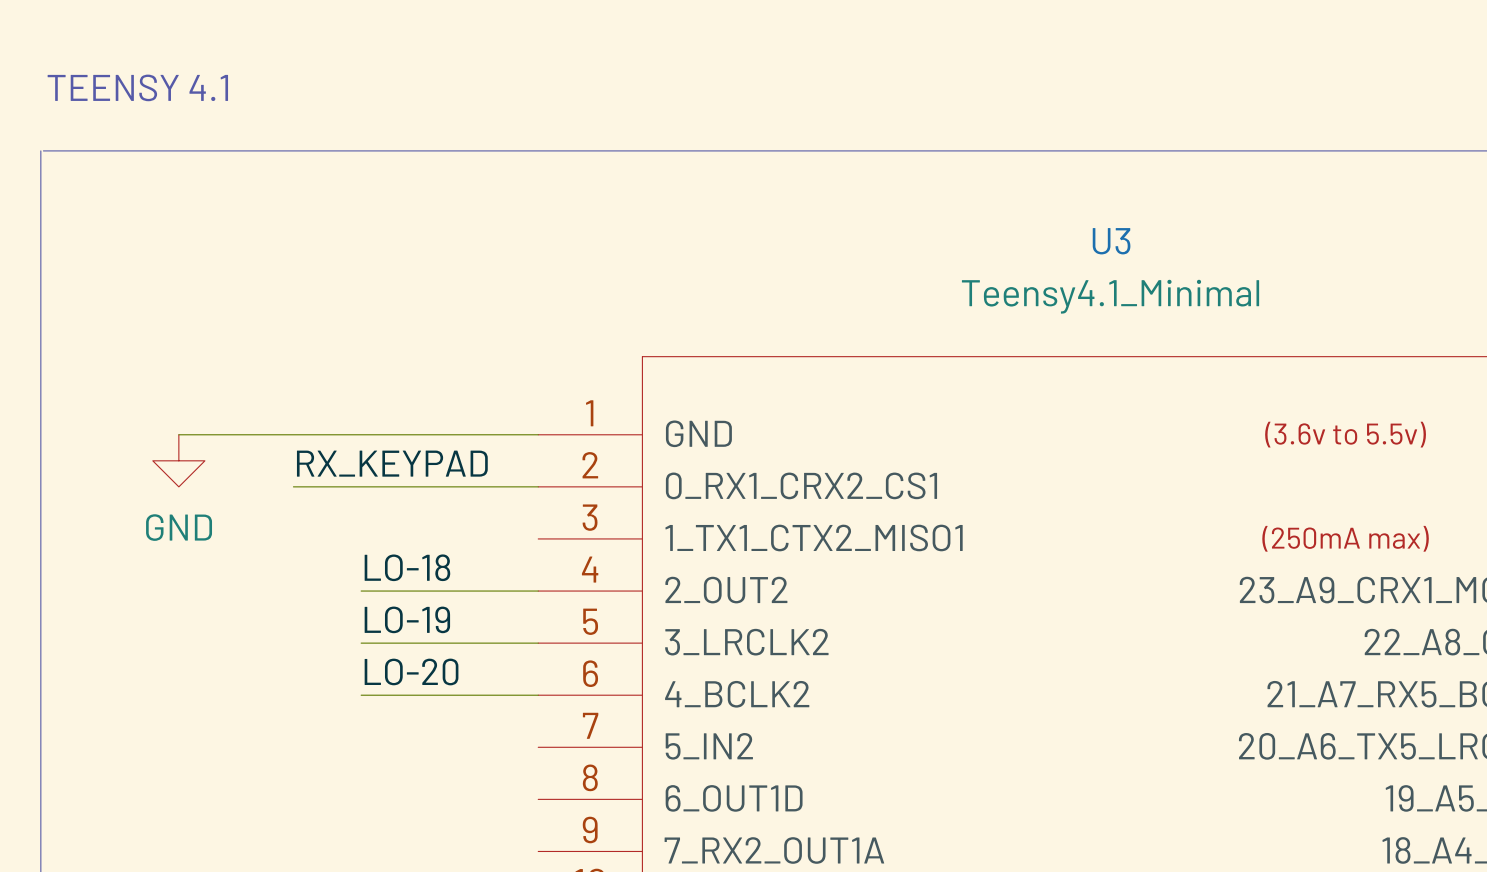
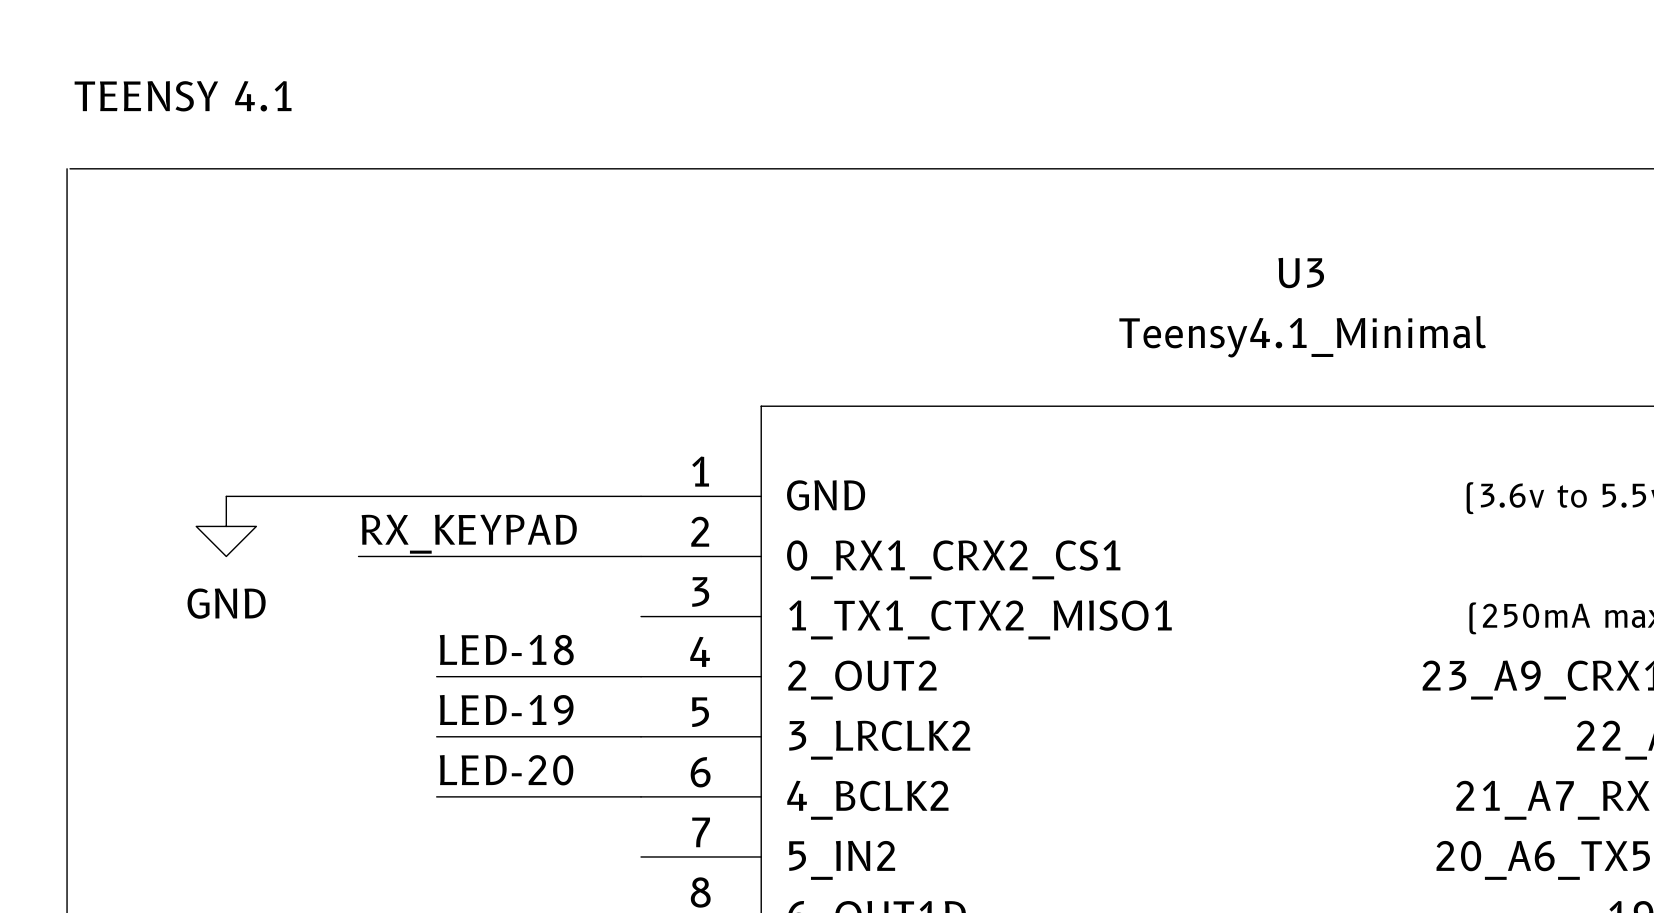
label: LO-18 (407, 567) -> LED-18 (506, 650)
label: LO-19 (407, 619) -> LED-19 (506, 710)
label: LO-20 (411, 671) -> LED-20 (506, 770)

